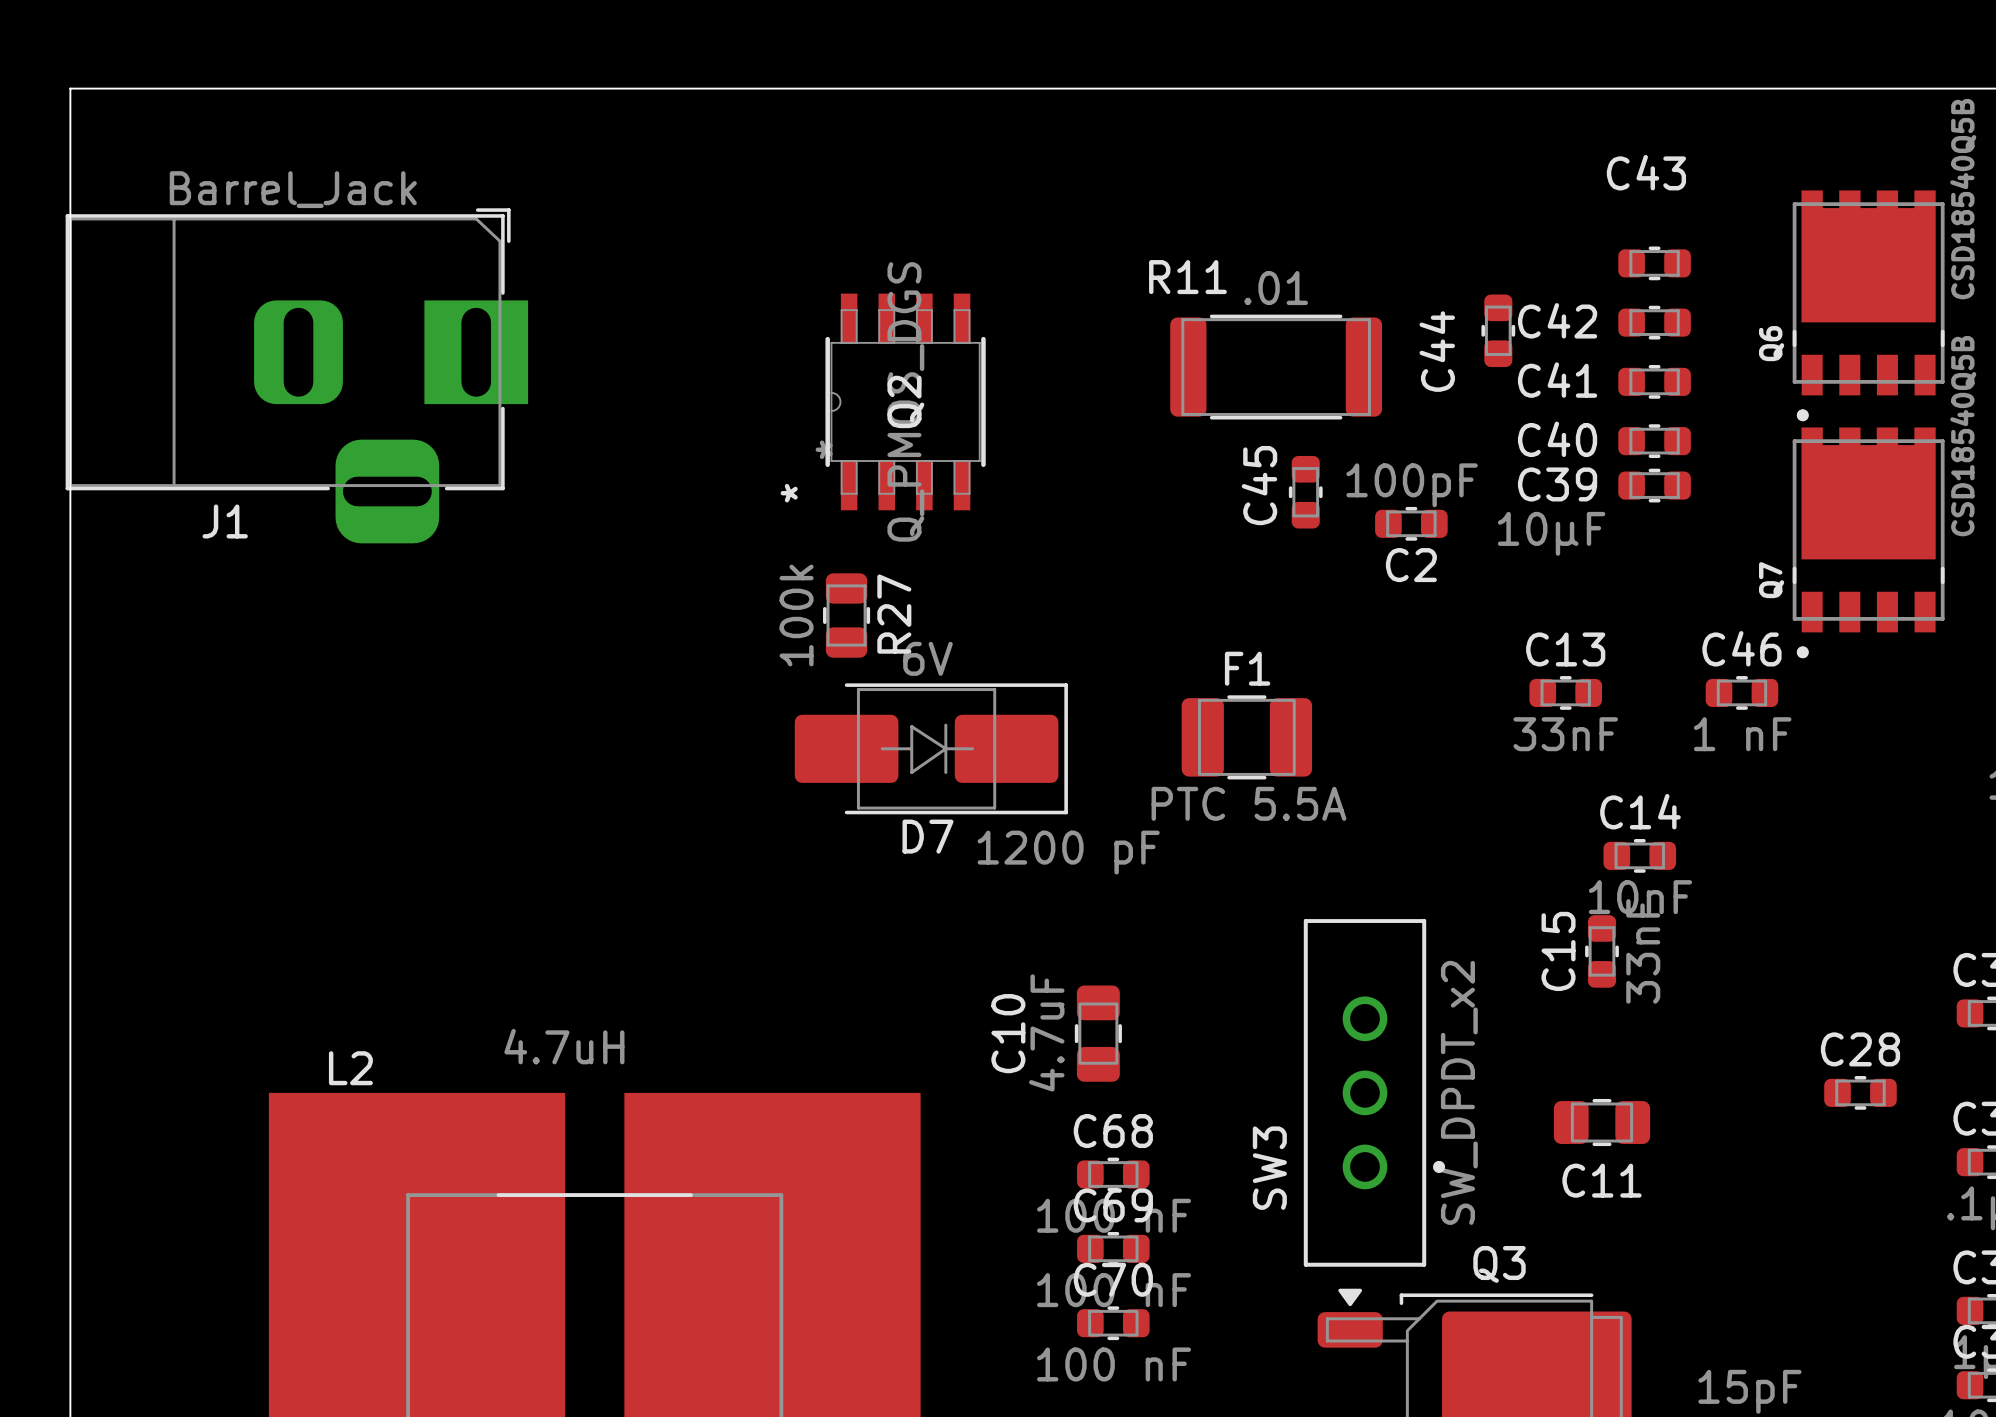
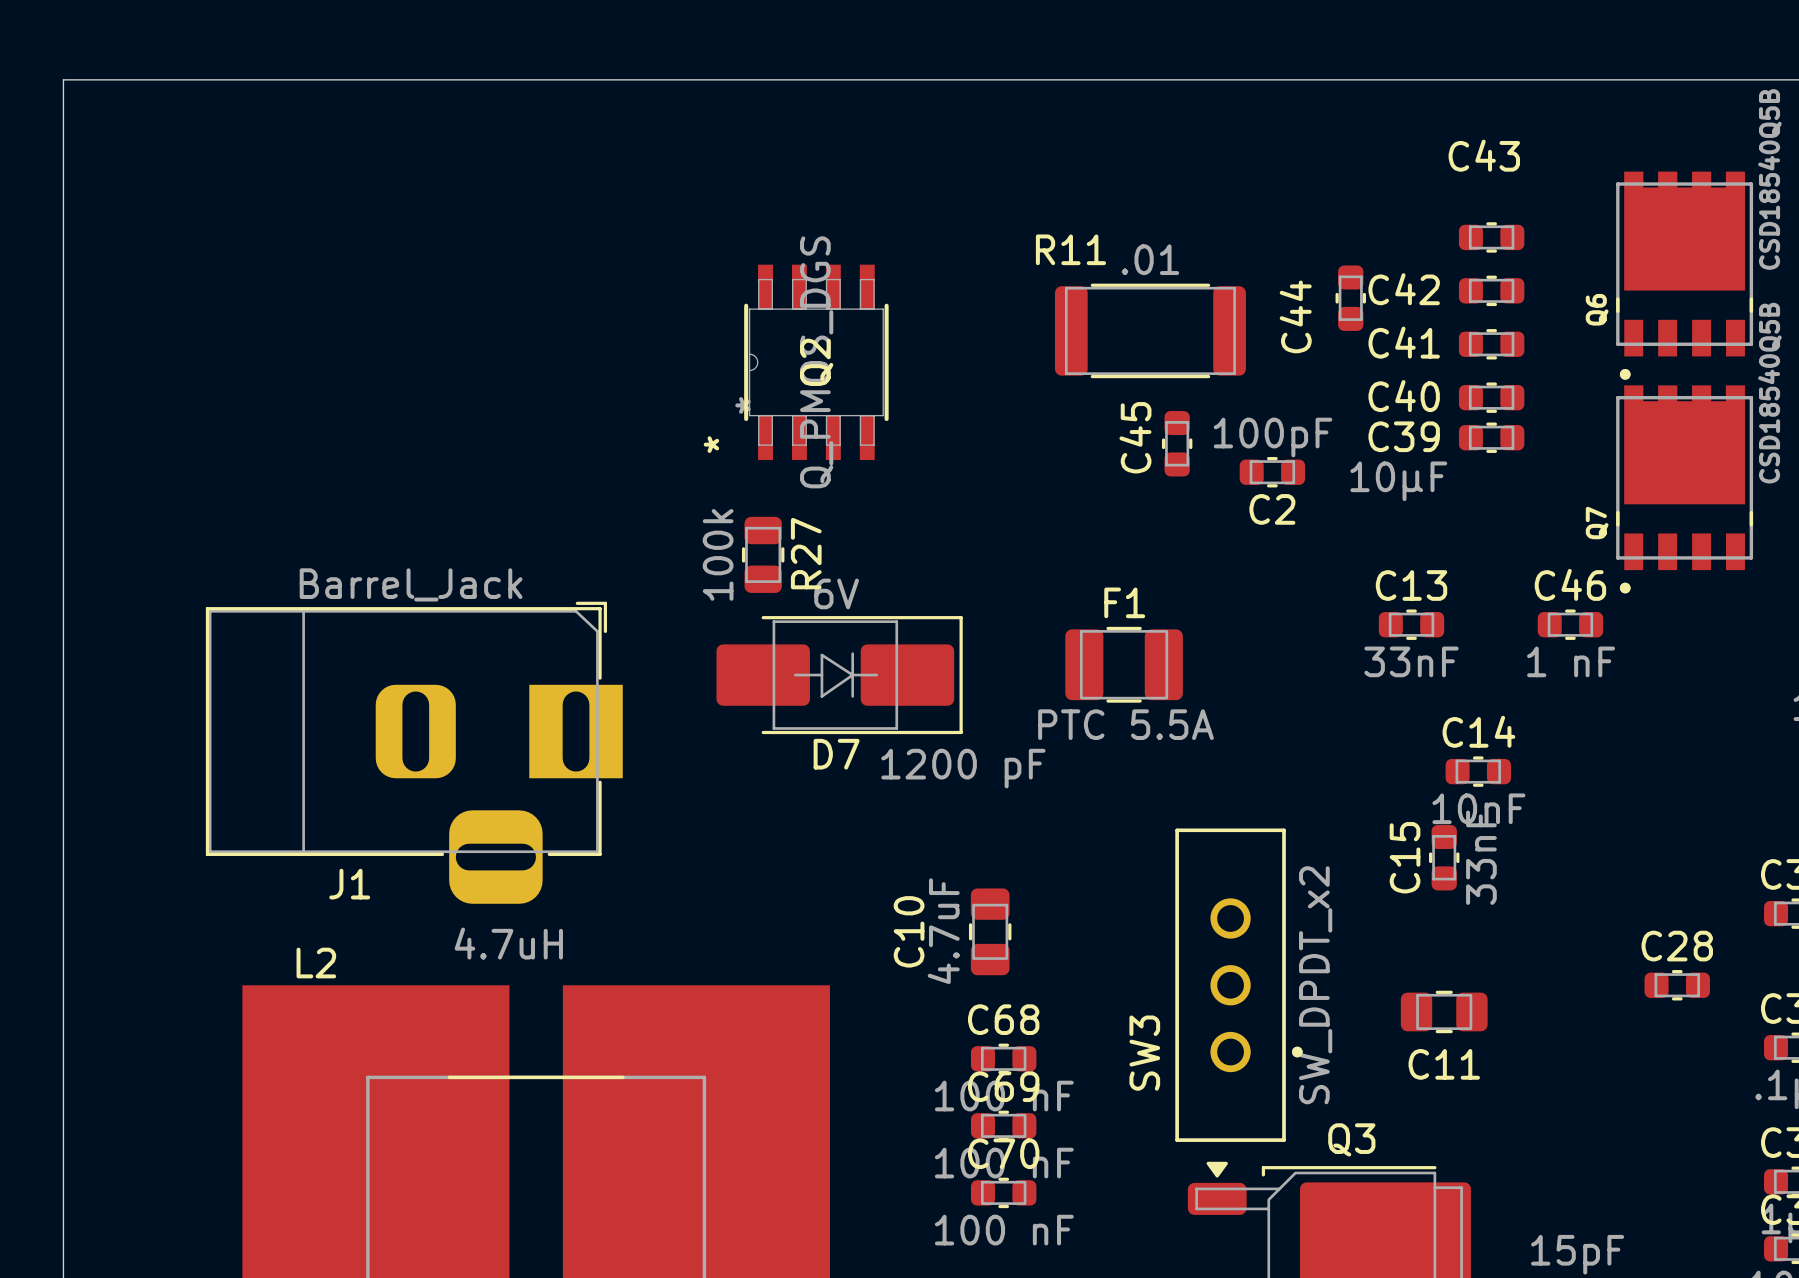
J1 position: (296, 375) -> (414, 752)

